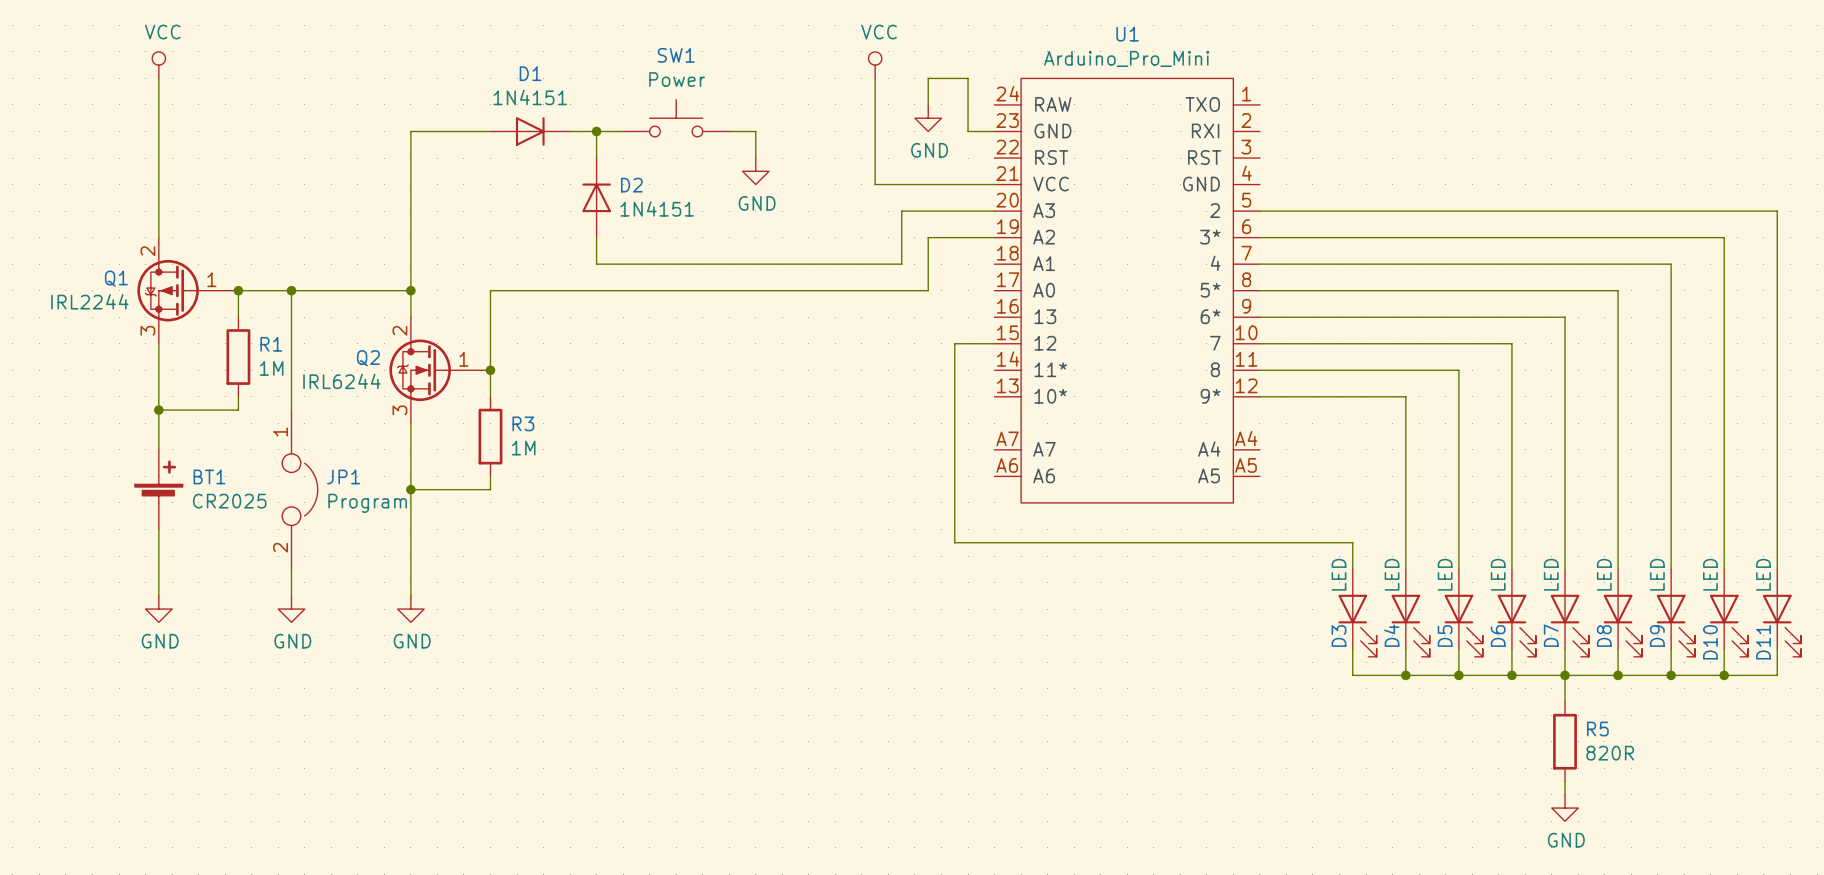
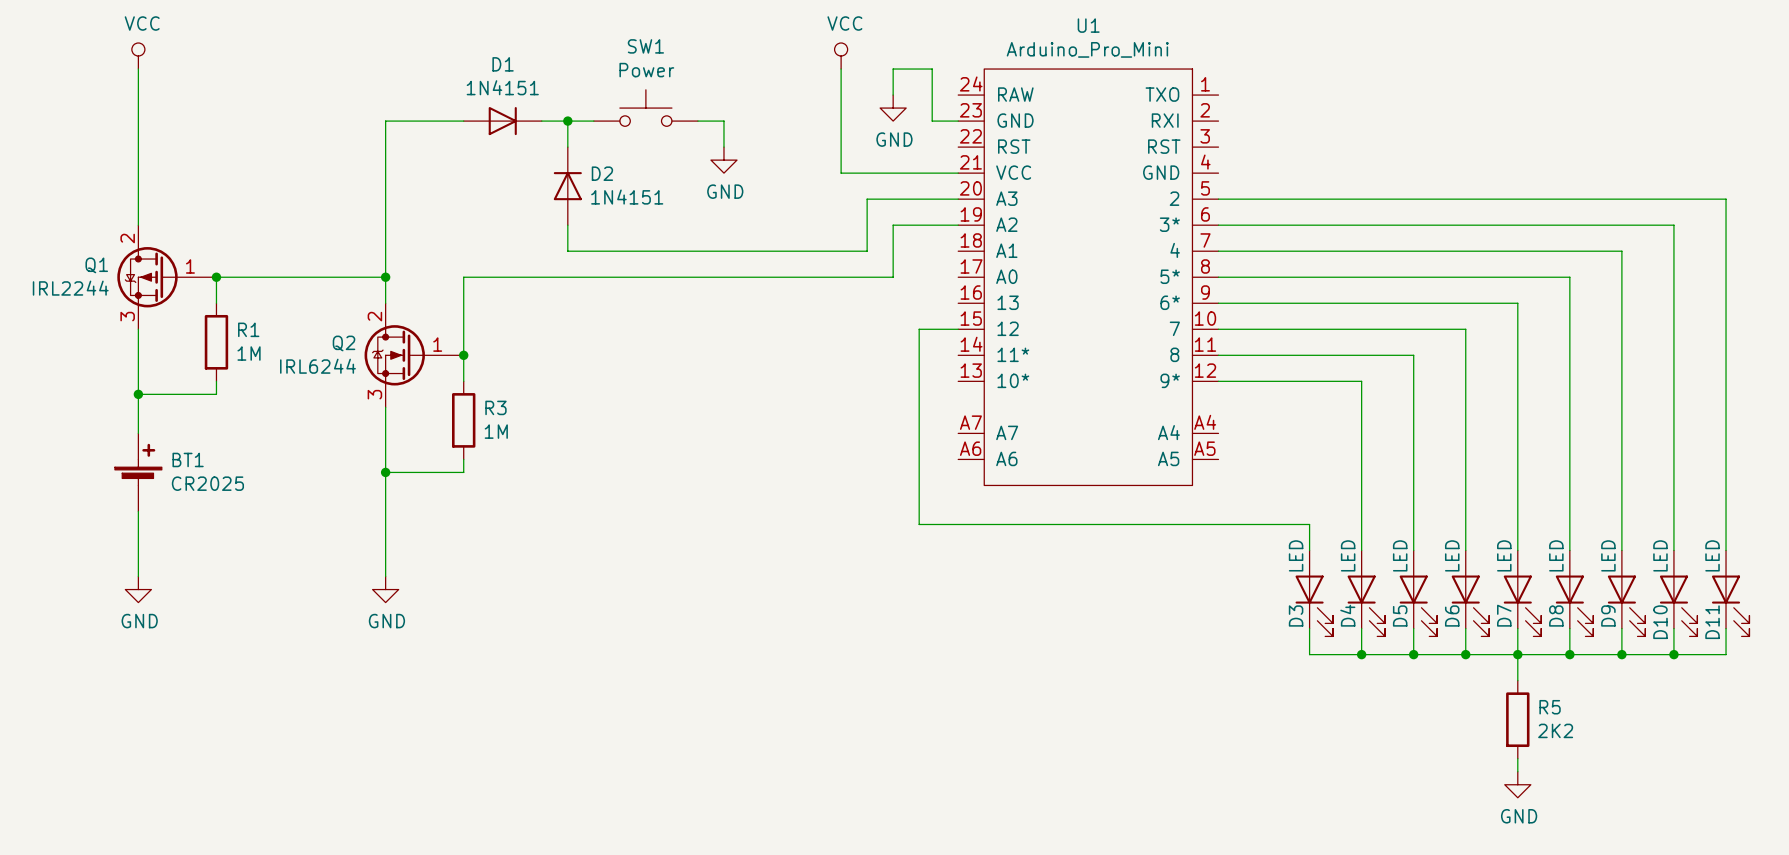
wire: (291, 290) (291, 410) -> none
junction: (291, 290) -> none
JP1: Program (299, 489) -> none
wire: (291, 569) (291, 595) -> none
power symbol: GND (291, 609) -> none
R5 value: 820R (1610, 753) -> 2K2 (1555, 730)

